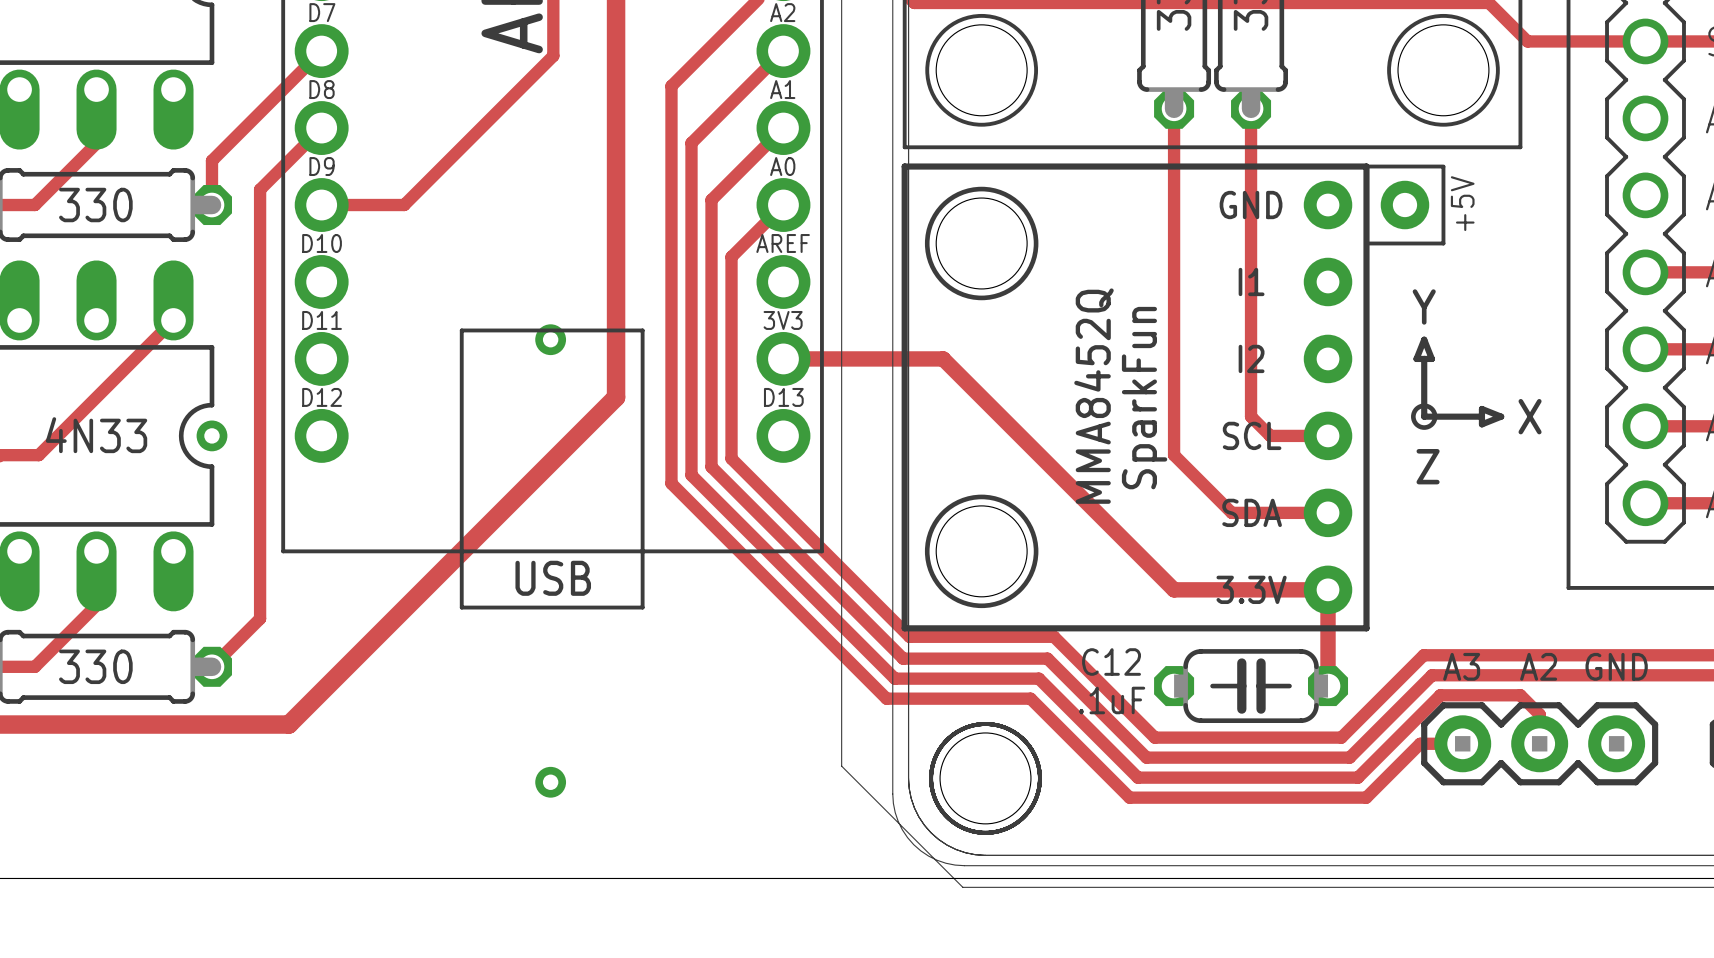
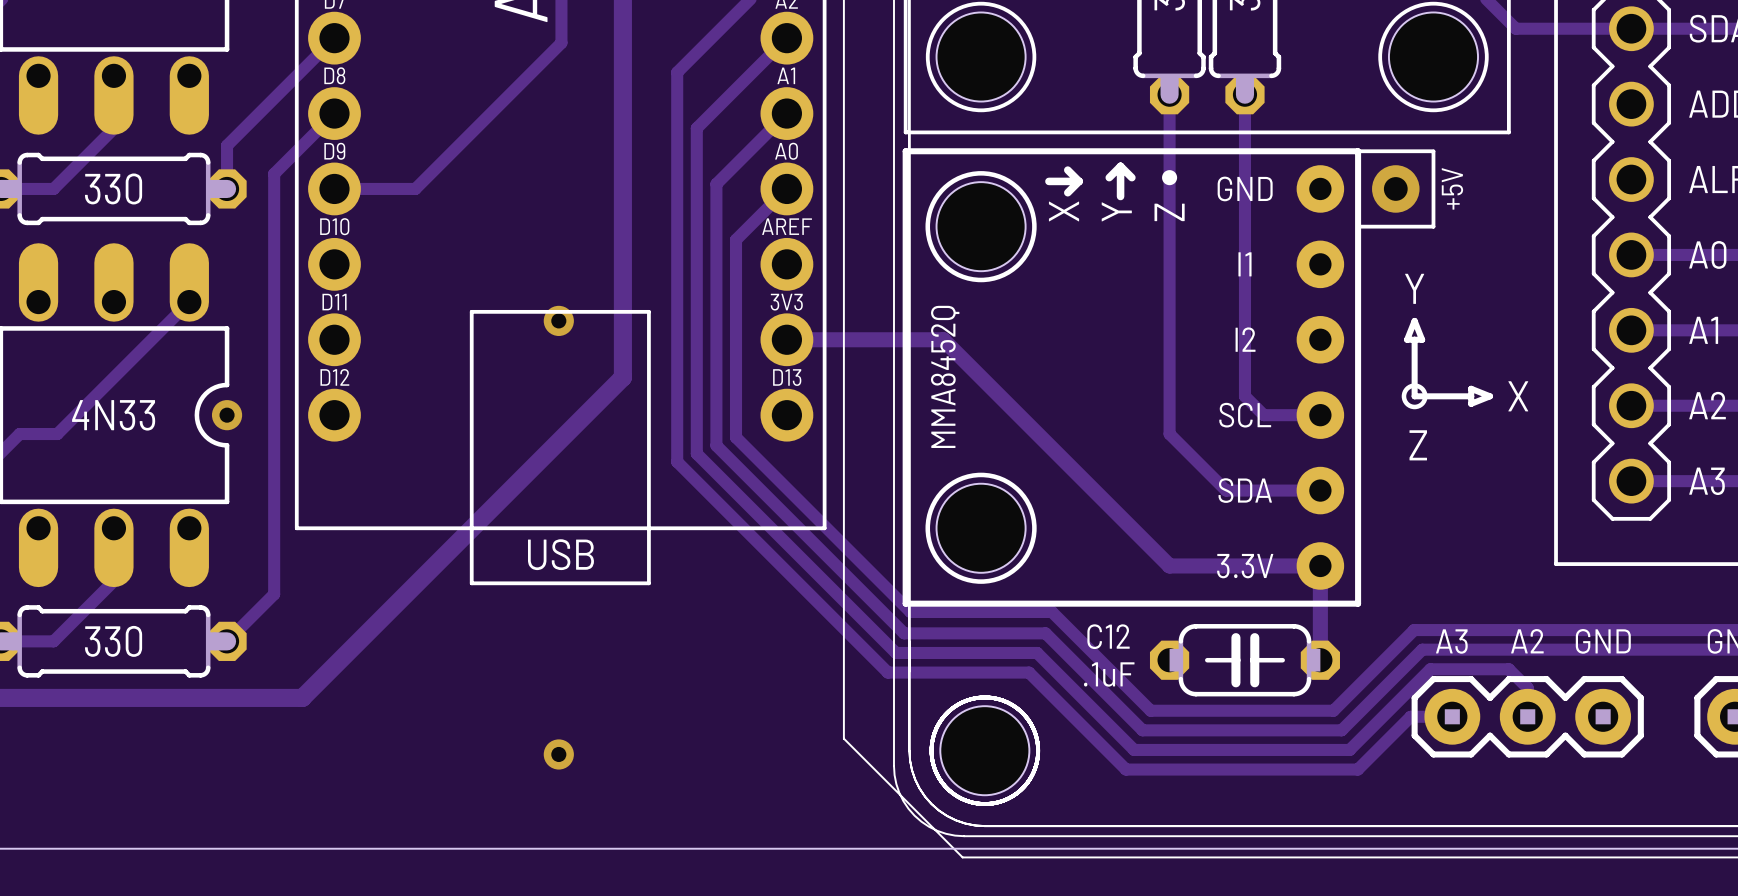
part footprint: [901, 163, 1370, 632] -> [902, 148, 1362, 607]

